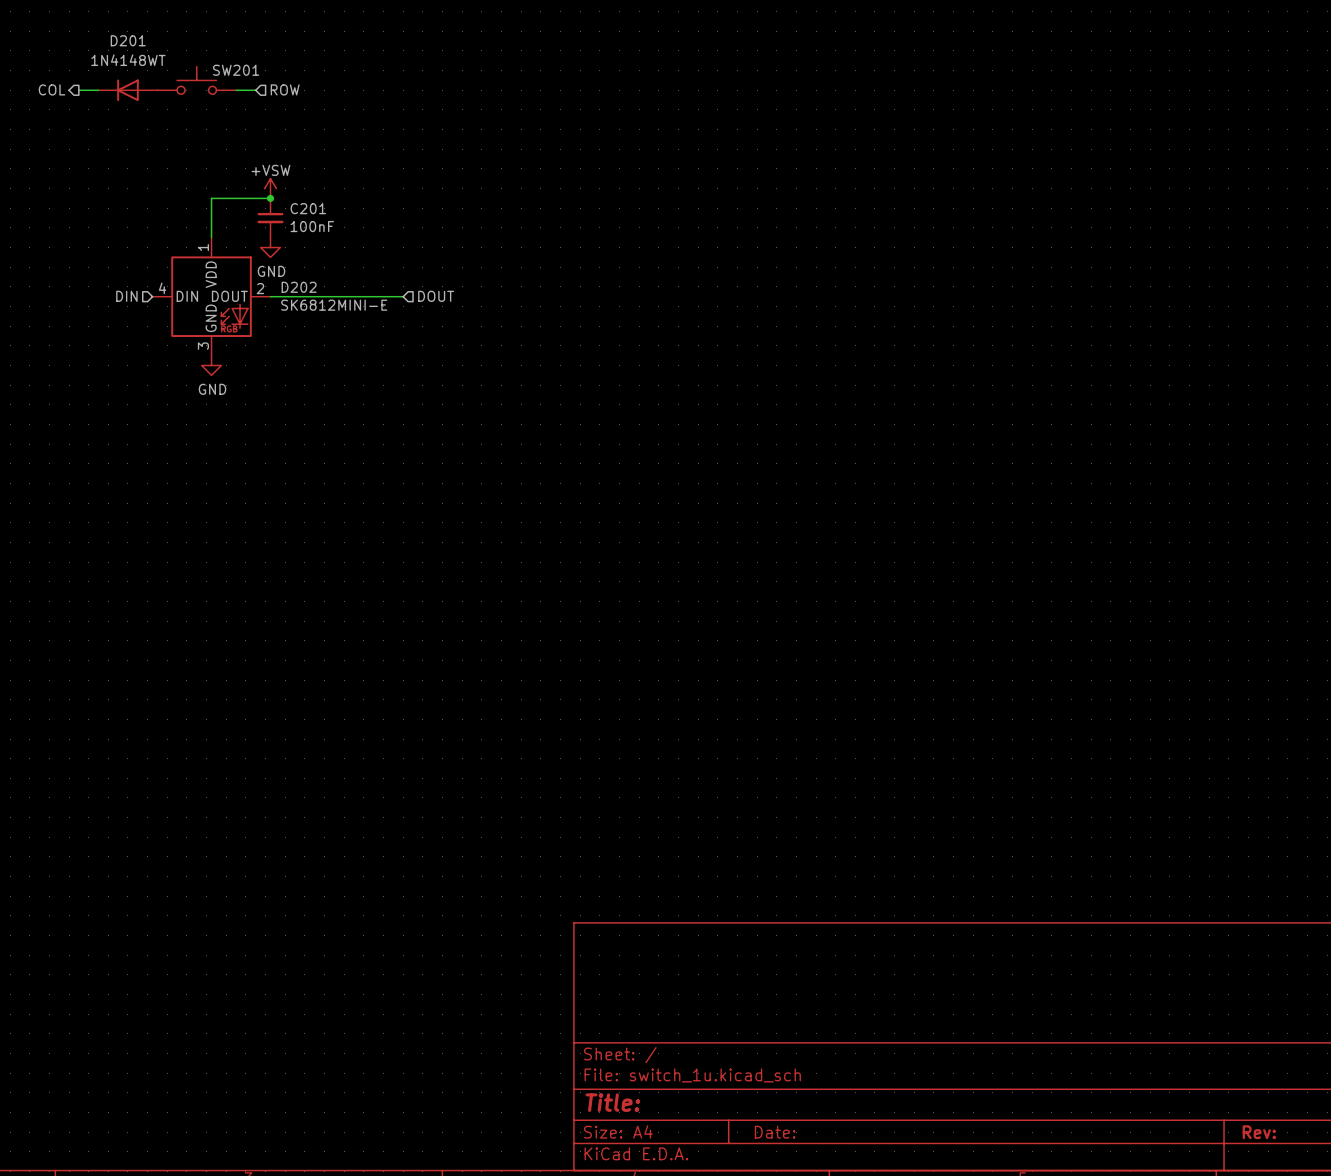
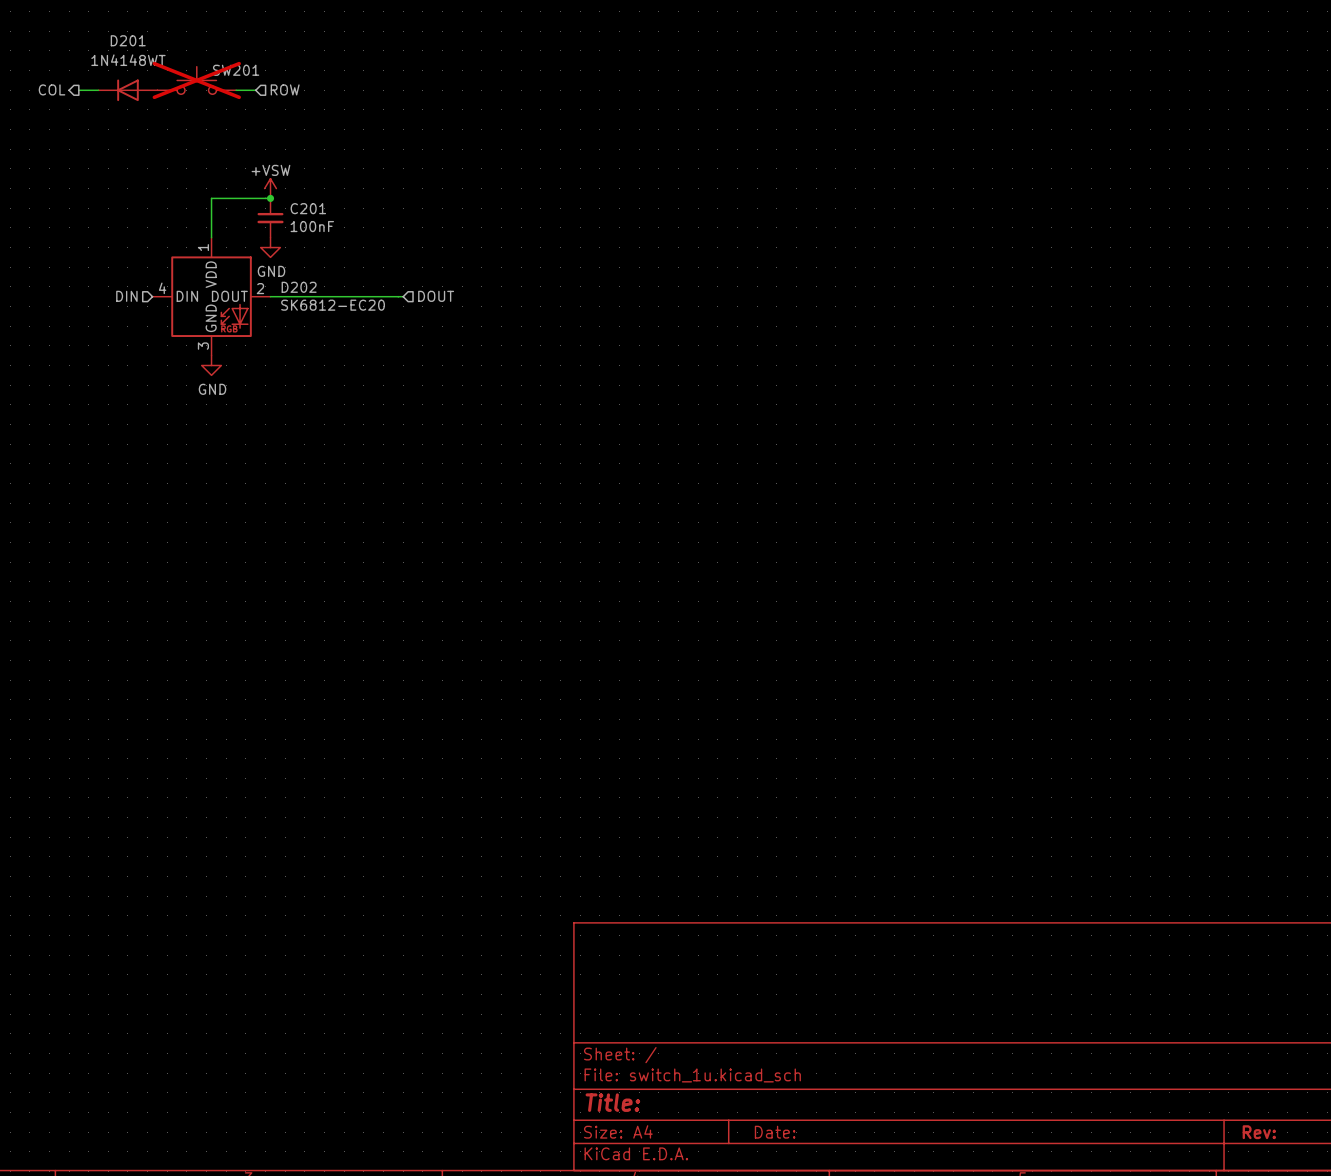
SW201 do-not-place cross: none -> (196, 80)
D202 value: SK6812MINI-E (334, 305) -> SK6812-EC20 (333, 305)

